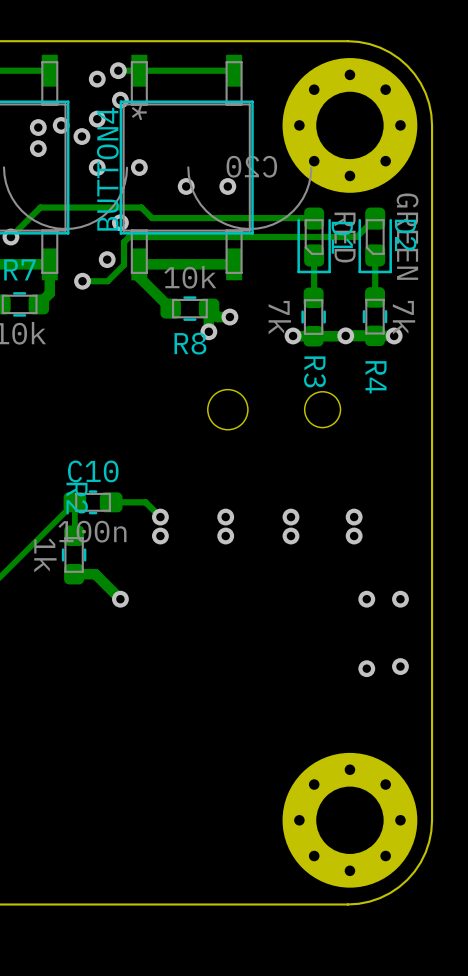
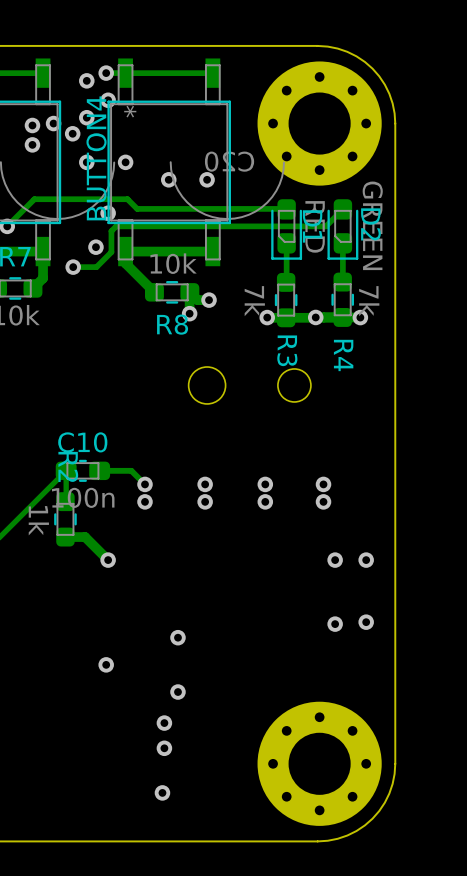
via: none -> (177, 637)
via: none -> (106, 664)
via: none -> (177, 692)
via: none -> (164, 723)
via: none -> (164, 748)
via: none -> (162, 792)

